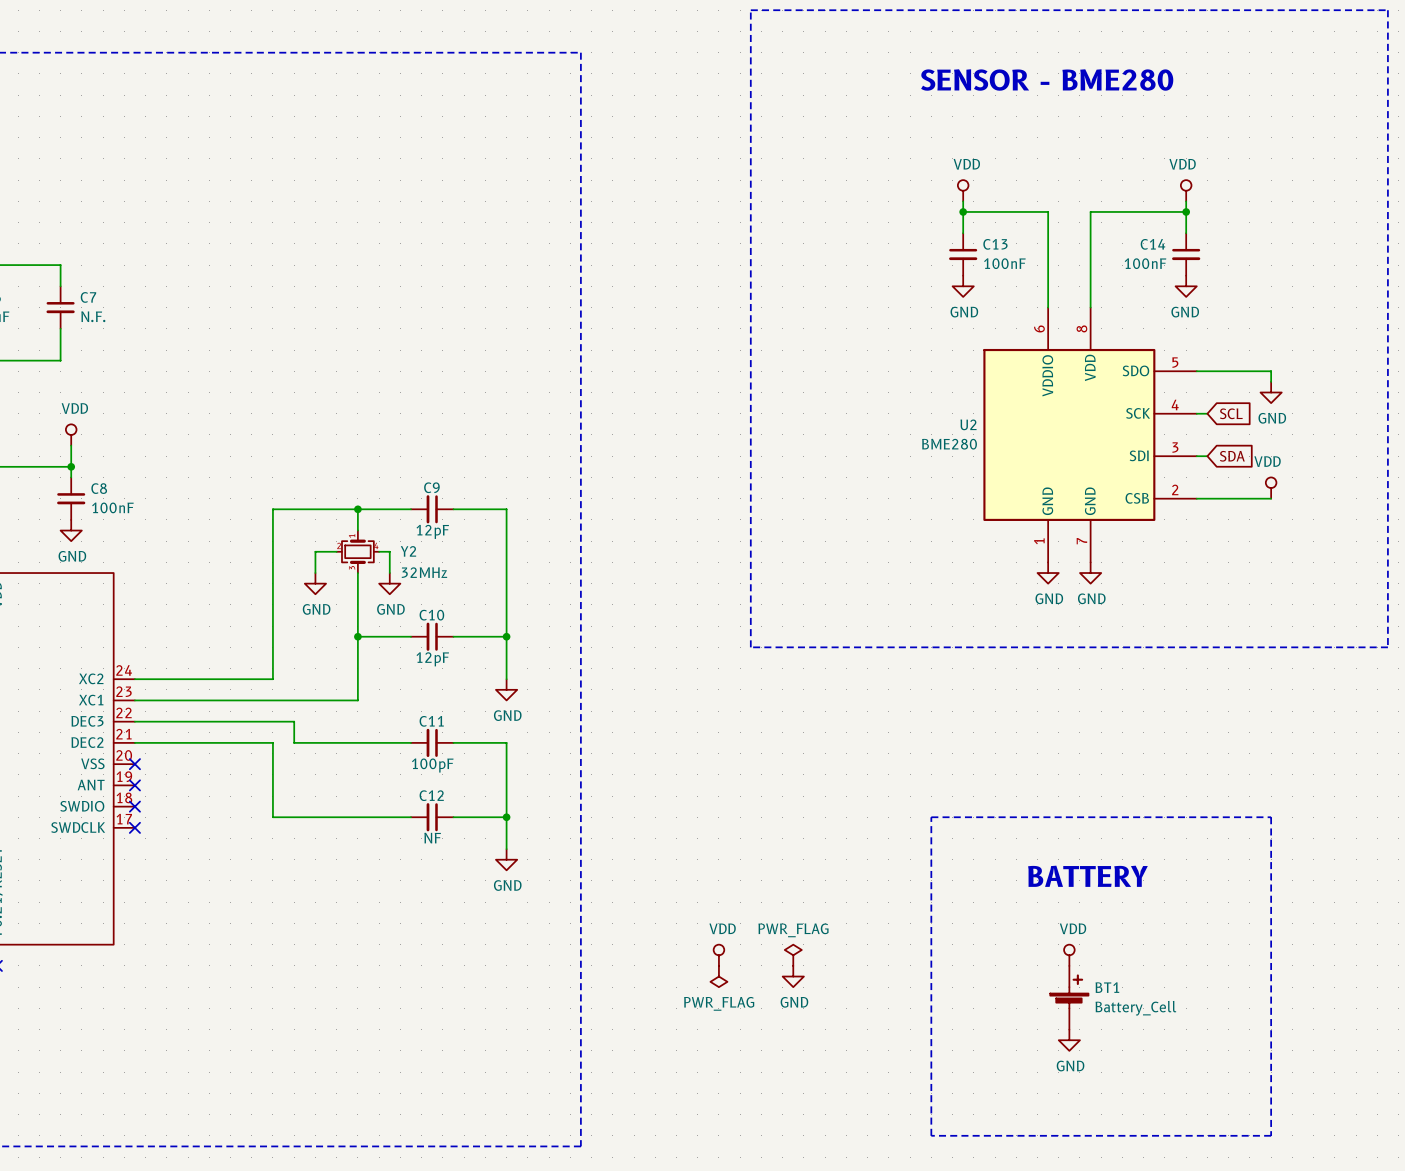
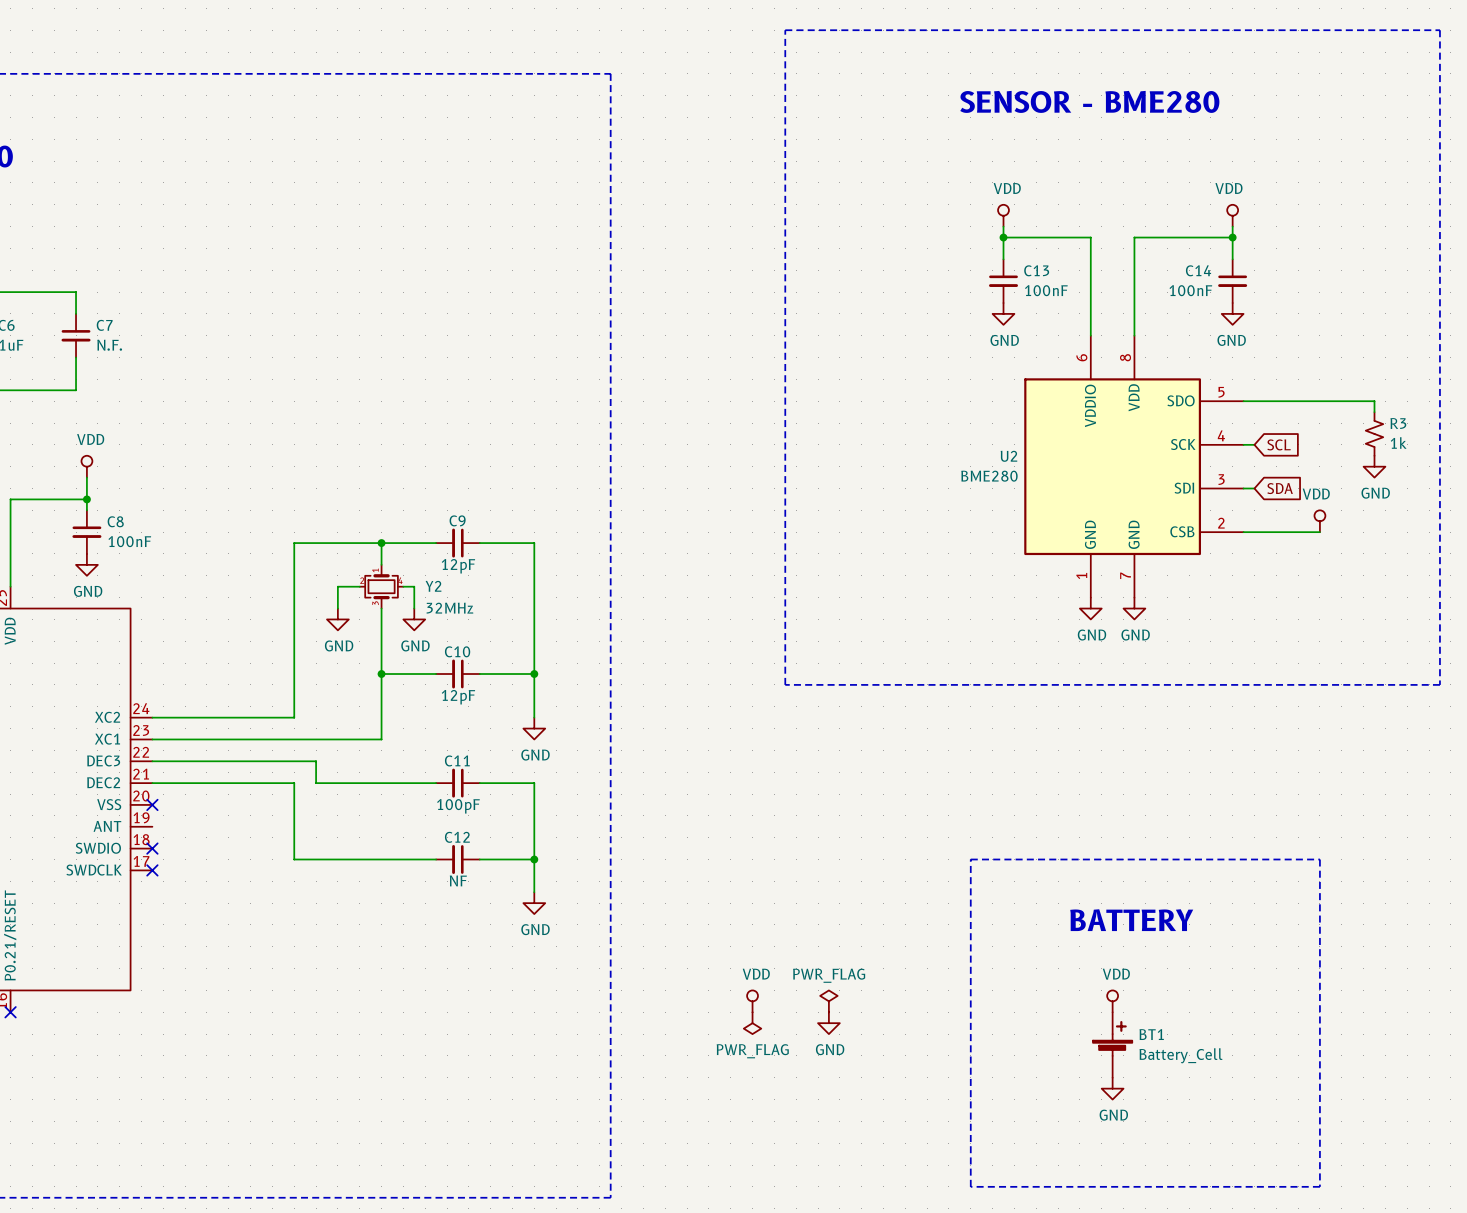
wire: (1271, 371) (1271, 381) -> (1319, 401) (1374, 401) (1374, 412)
power symbol position: GND (1271, 392) -> GND (1374, 466)
R3: none -> 1k (1374, 433)
no-connect mark: (134, 785) -> none

